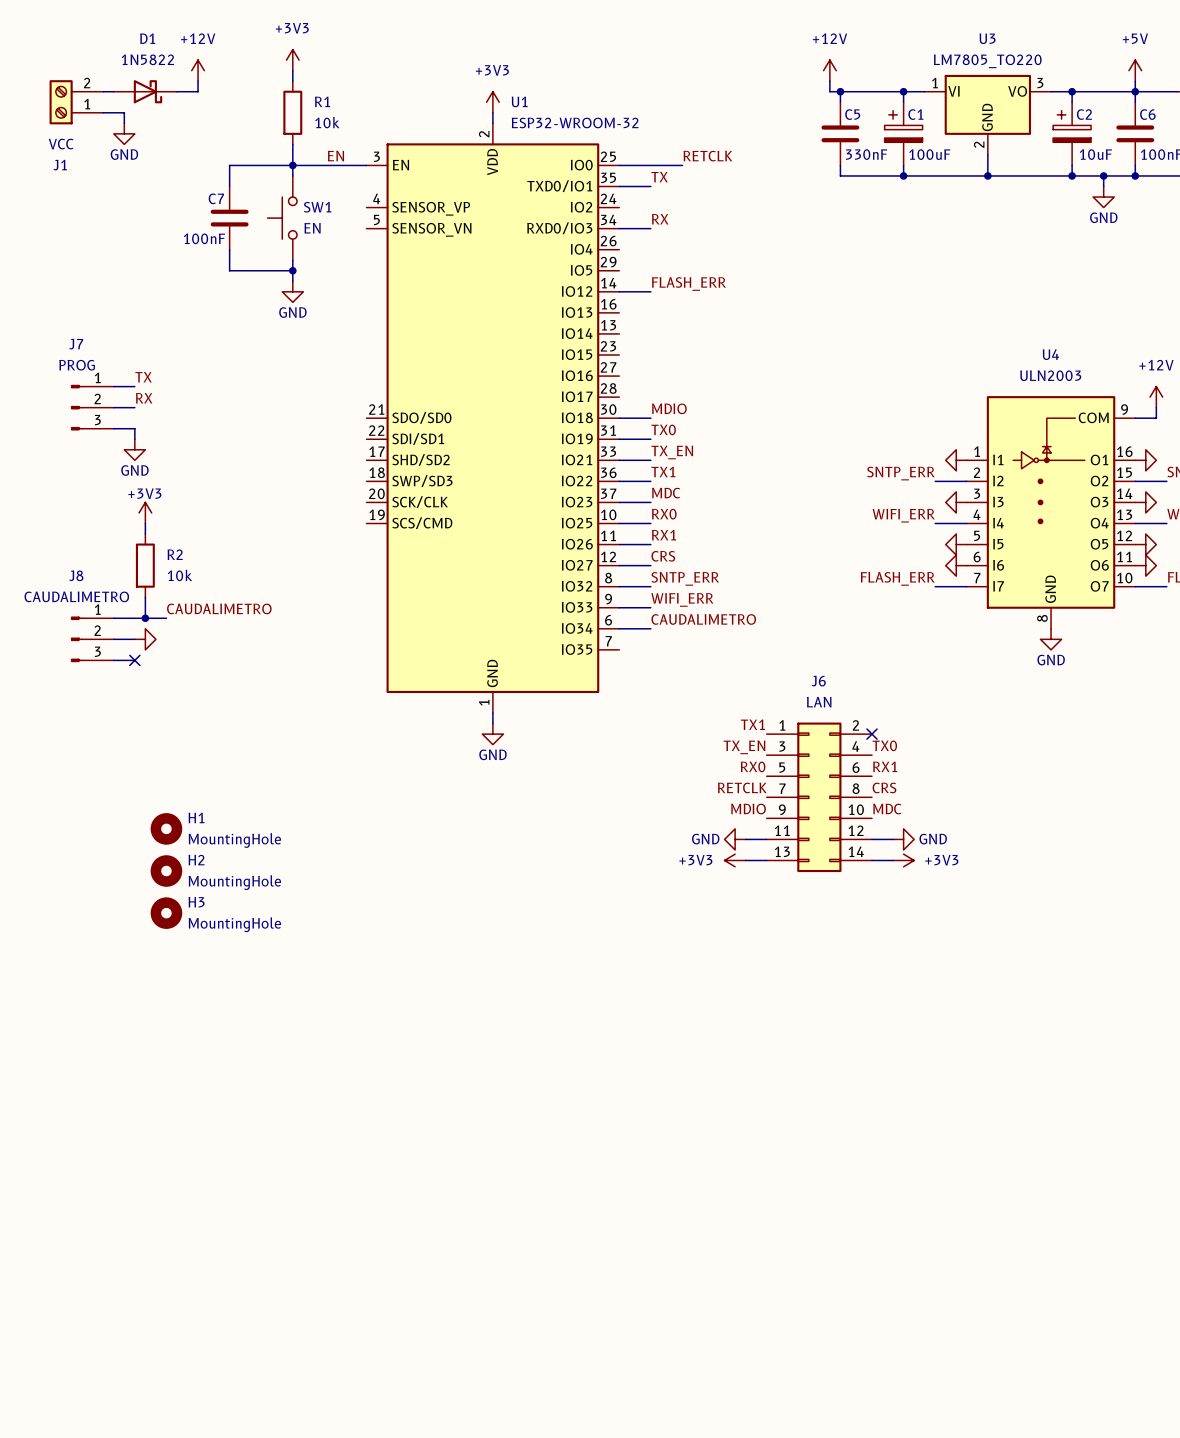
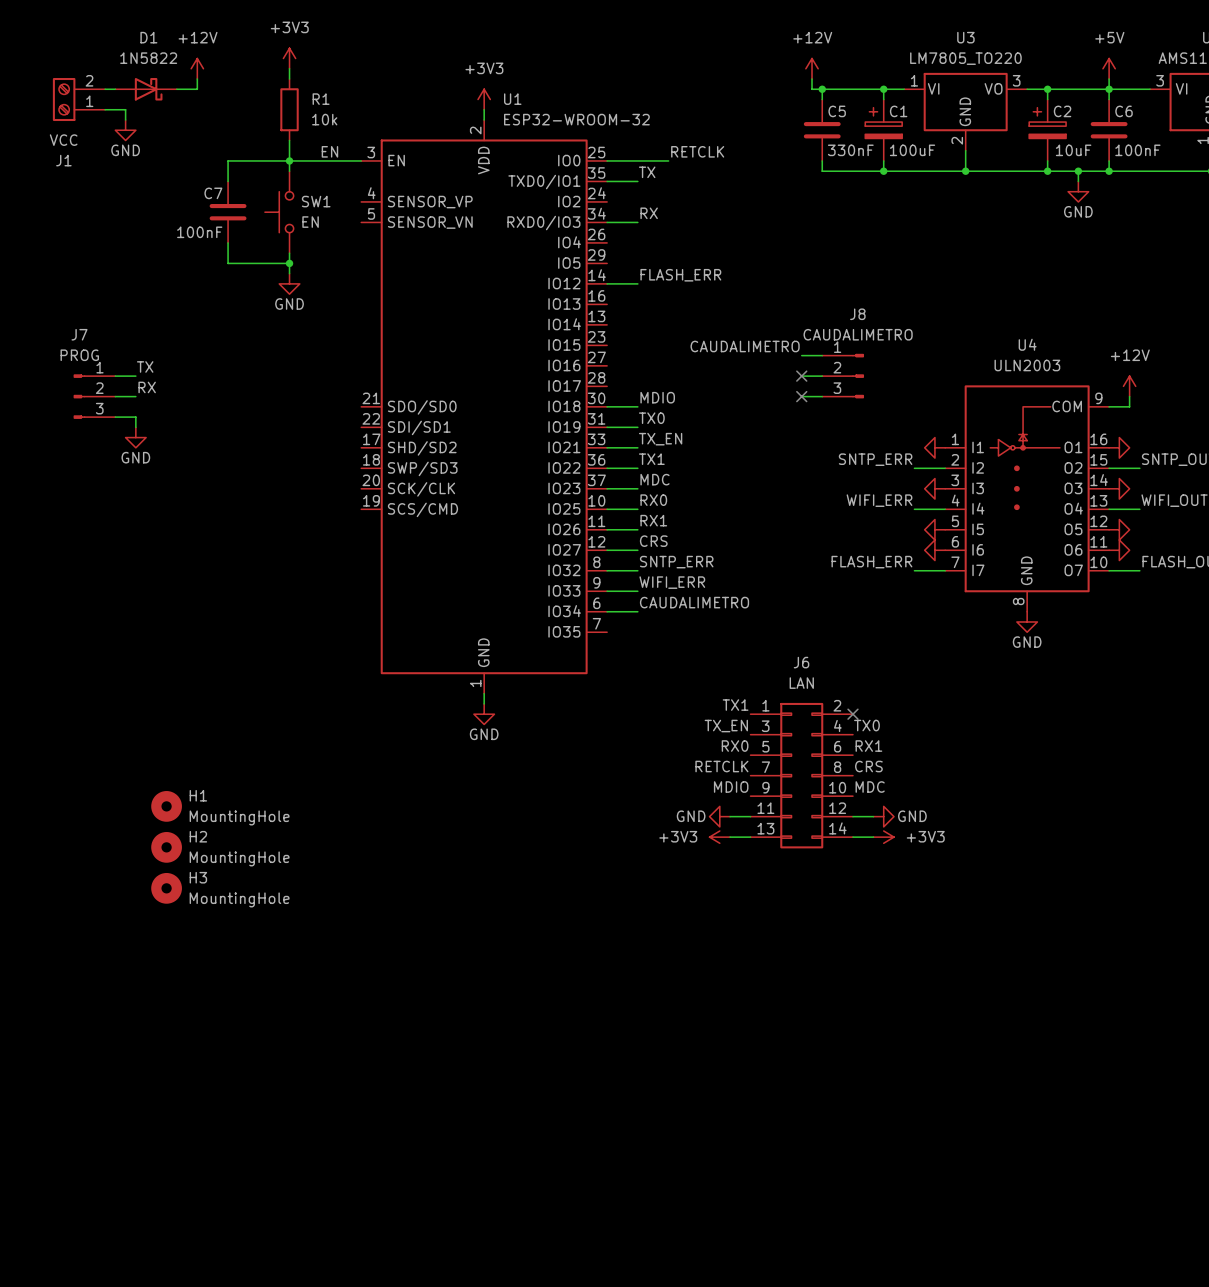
label: none -> CAUDALIMETRO (745, 346)
wire: none -> (801, 355) (822, 355)
wire: none -> (801, 376) (822, 376)
no-connect mark: none -> (801, 376)
wire: none -> (801, 396) (822, 396)
no-connect mark: none -> (801, 396)
power symbol: +3V3 (145, 512) -> none
wire: (145, 523) (145, 534) -> none
R2: 10k (145, 565) -> none
wire: (145, 597) (145, 618) -> none
label: CAUDALIMETRO (219, 608) -> none
wire: (113, 618) (166, 618) -> none
junction: (145, 618) -> none
J8 flip: as is (76, 639) -> left-right (858, 376)
J8 position: (92, 639) -> (843, 376)
wire: (113, 639) (134, 639) -> none
power symbol: (145, 639) -> none
wire: (113, 660) (134, 660) -> none
no-connect mark: (134, 660) -> none

